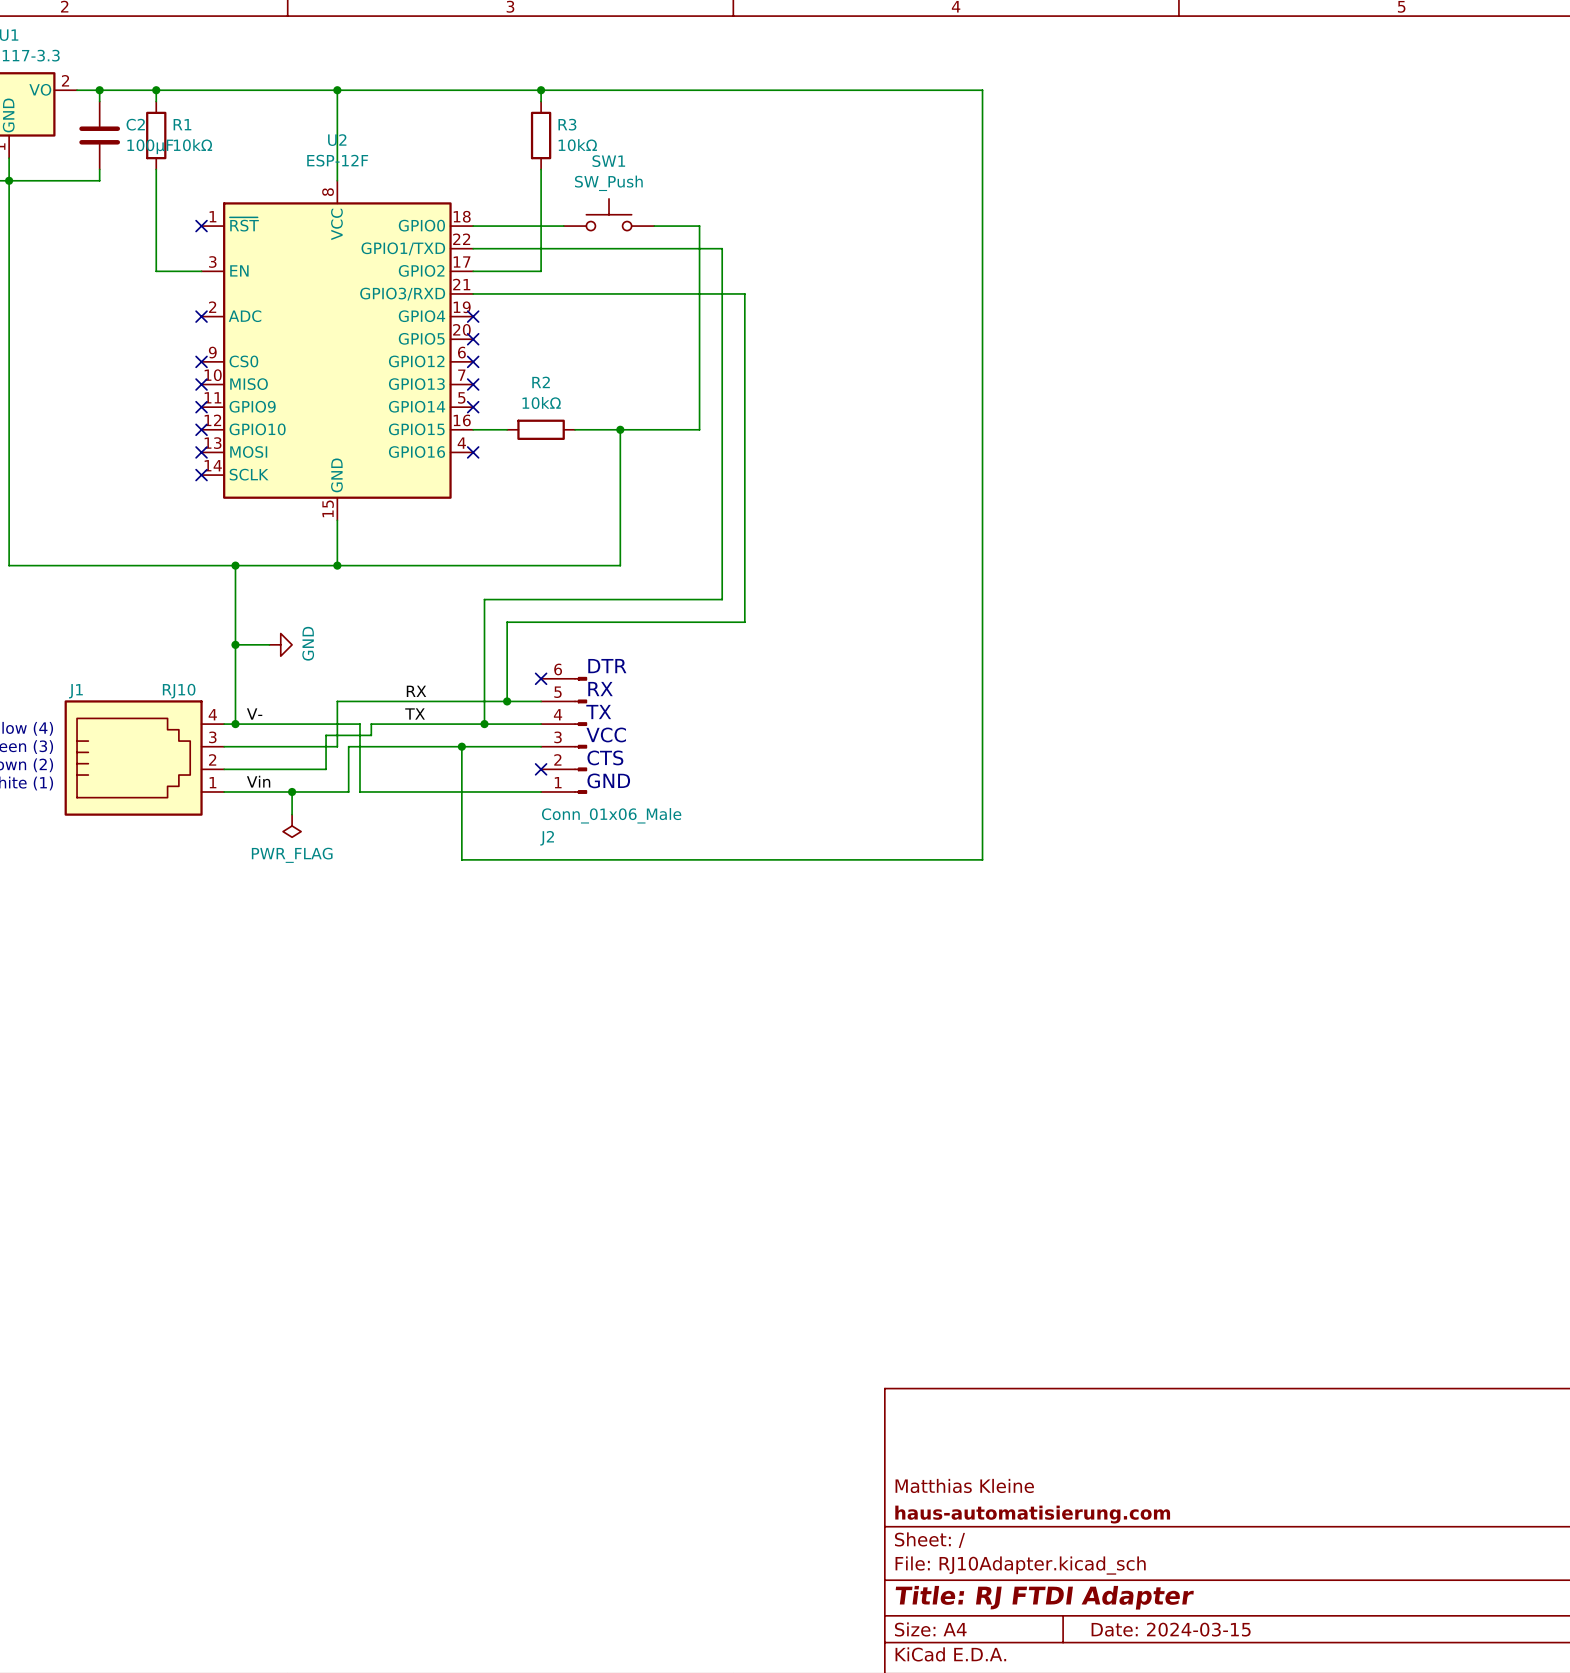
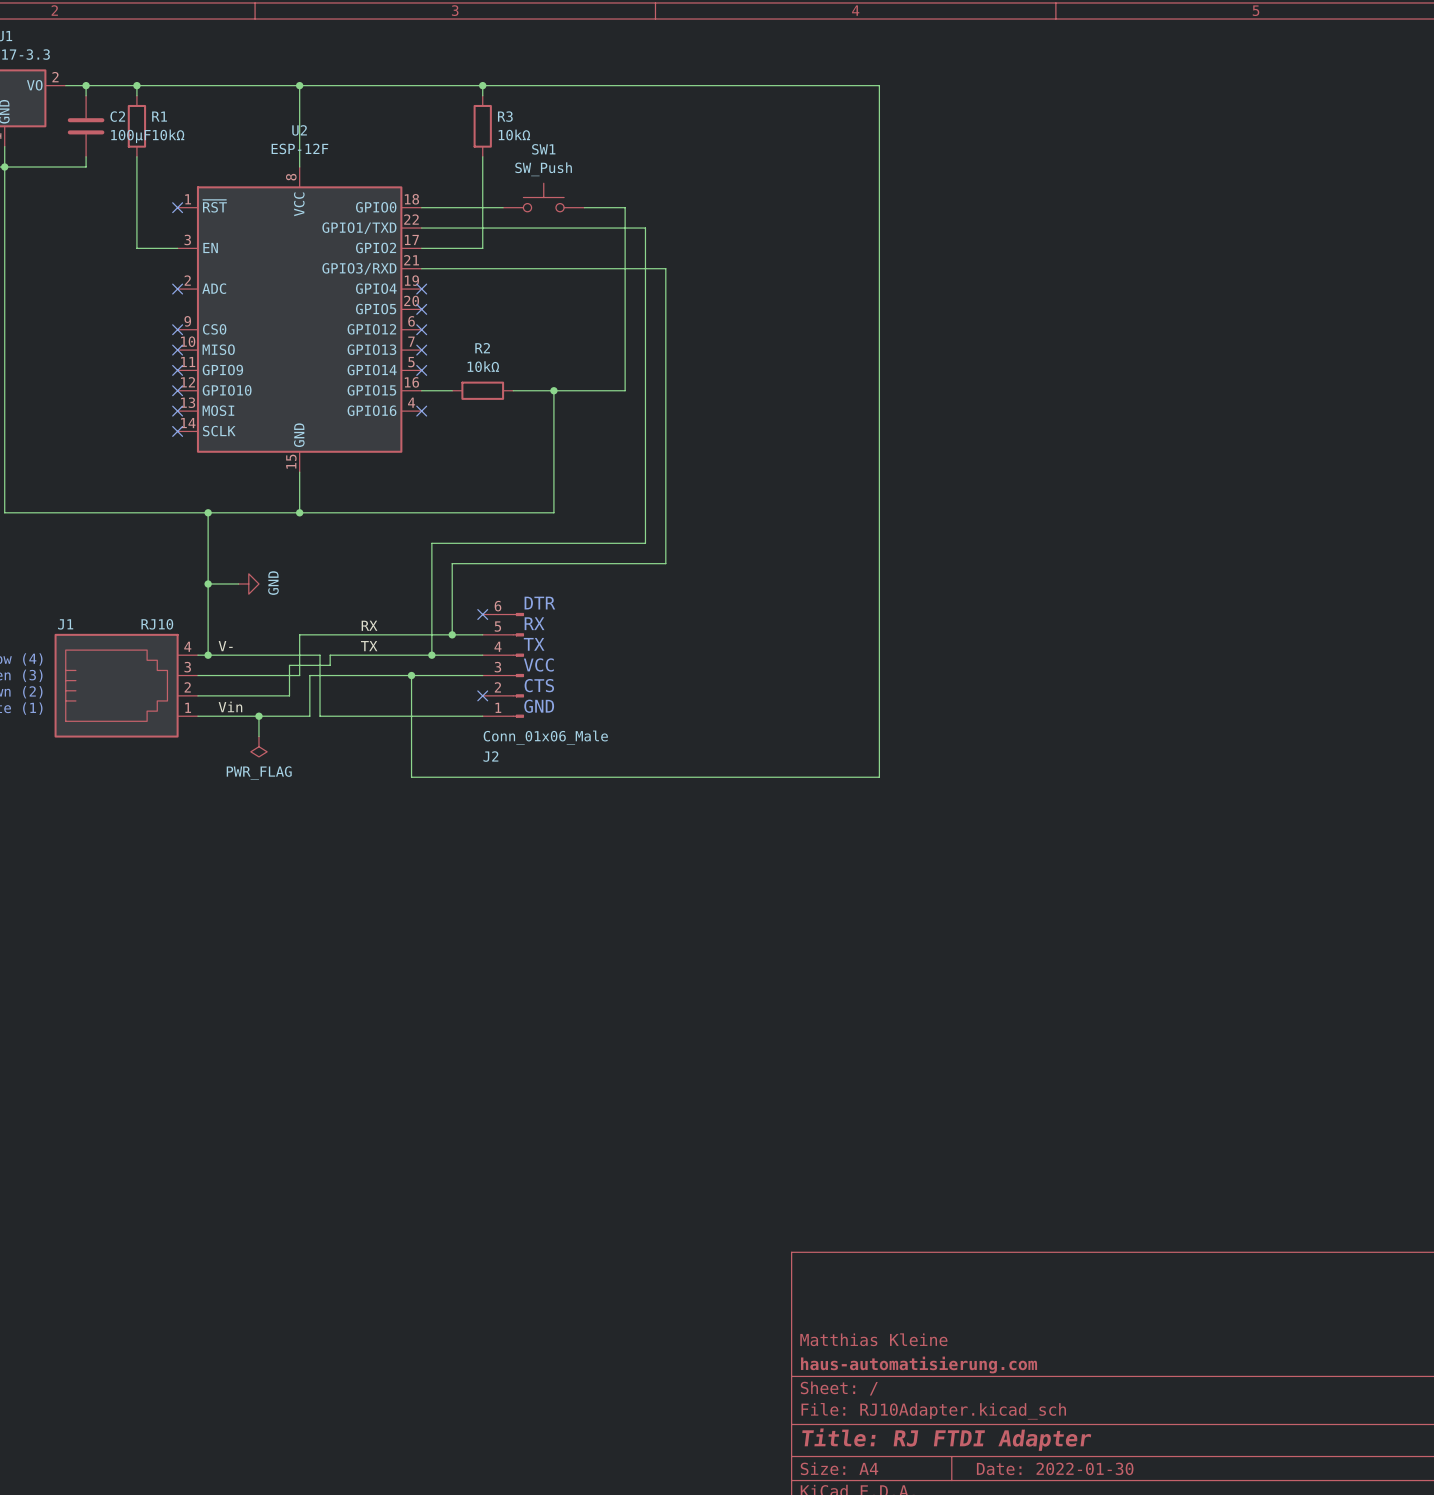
title block: Date: 2024-03-15 (1171, 1629) -> Date: 2022-01-30 (1055, 1468)

